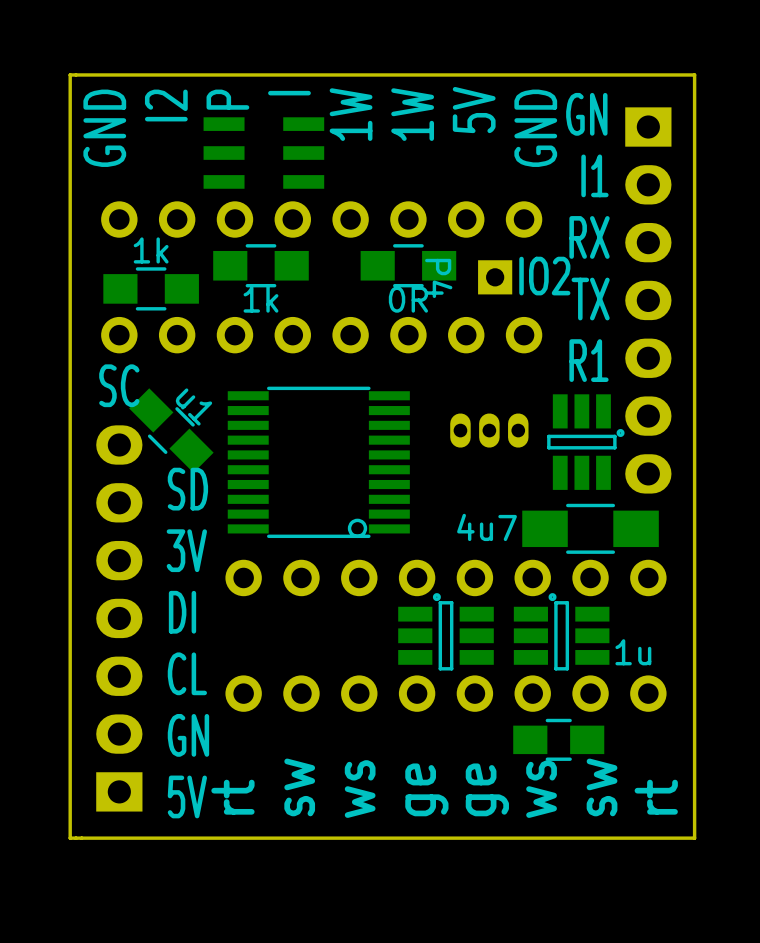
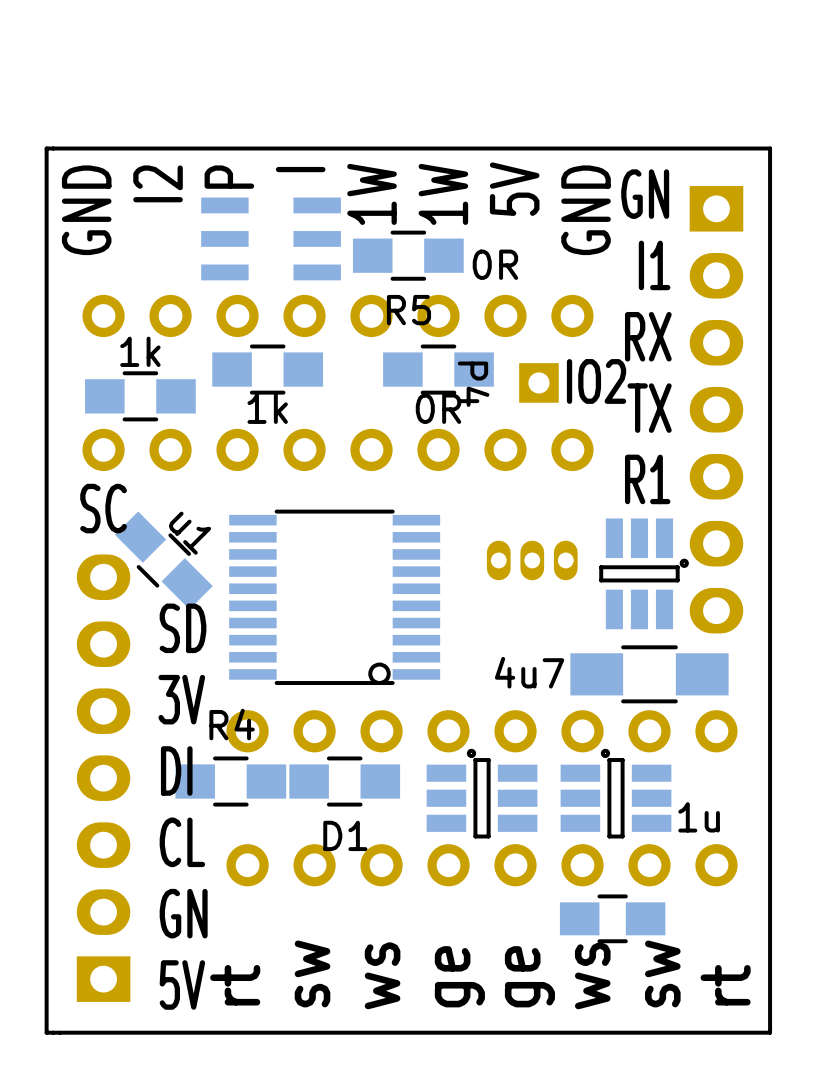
R5: none -> 0R (408, 255)
R4: none -> (230, 781)
D1: none -> (344, 781)

